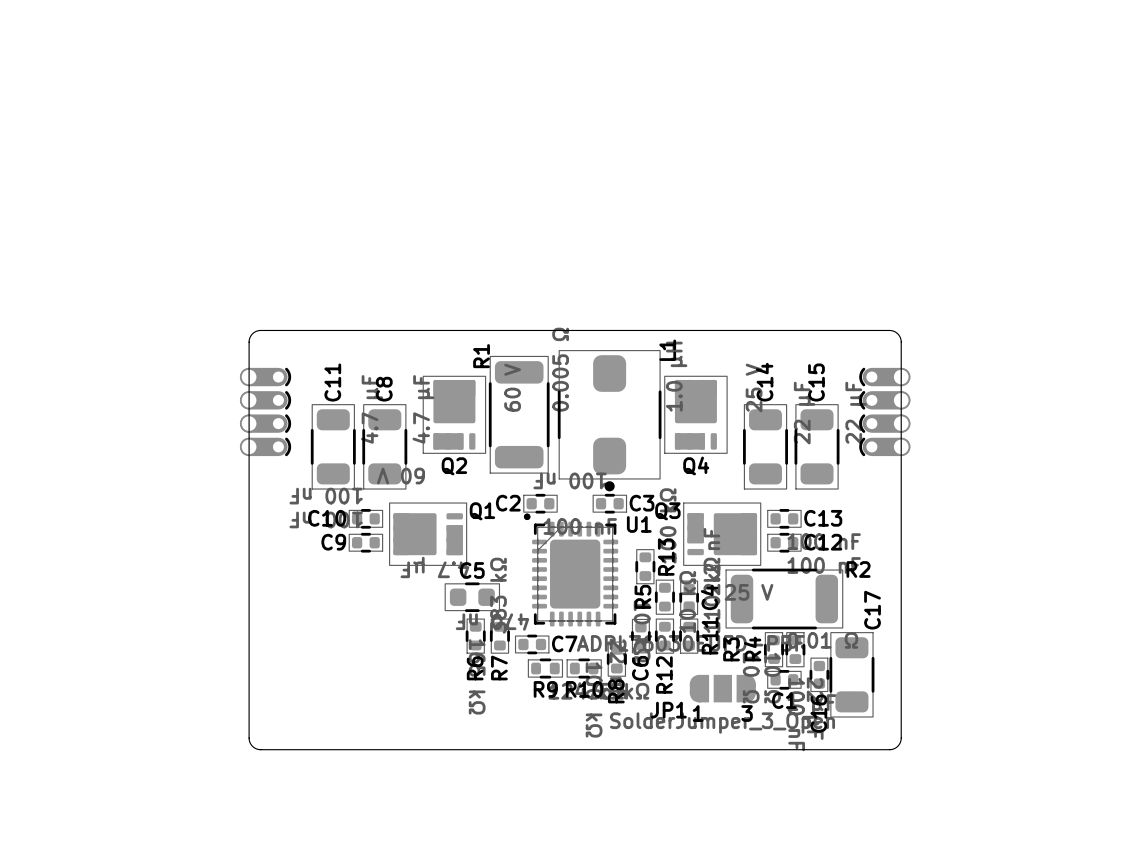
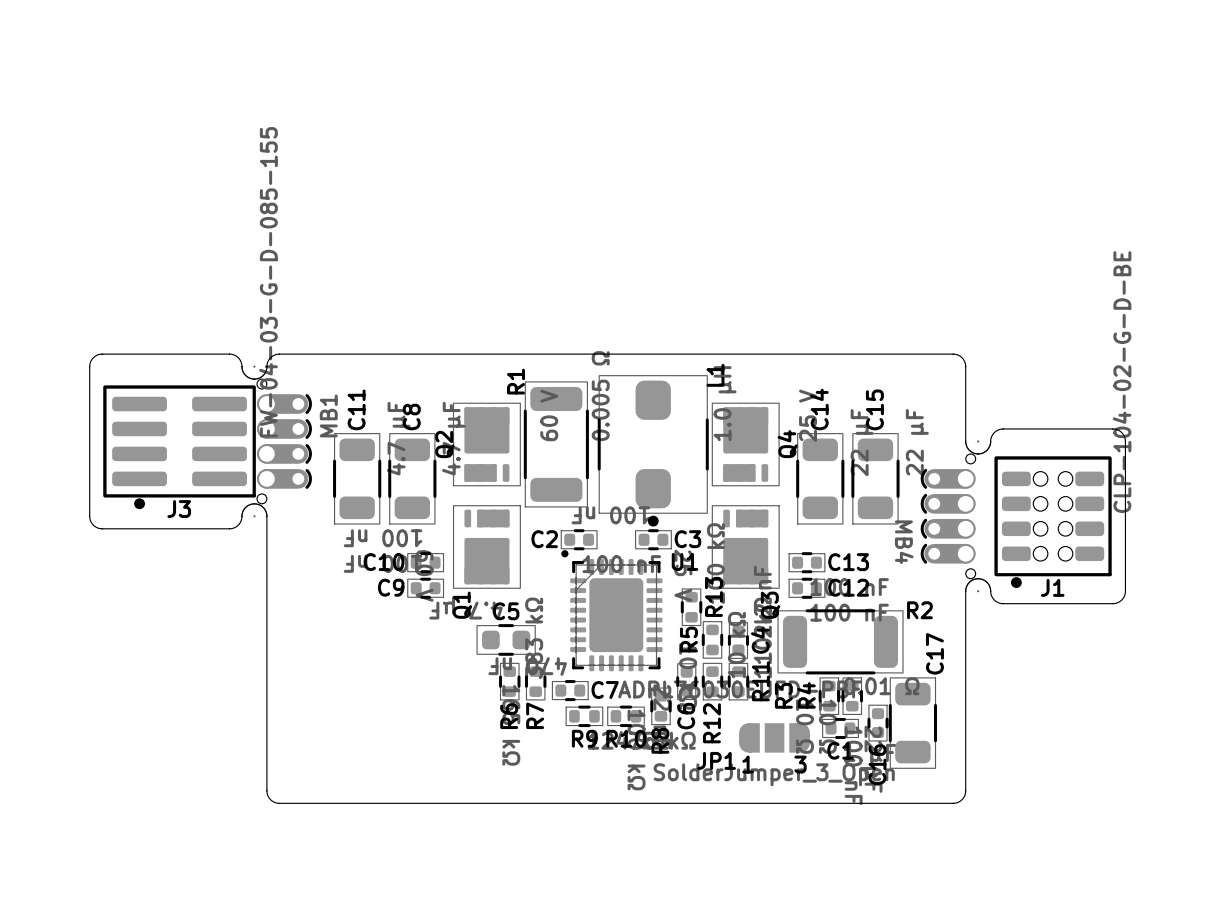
board edge: (249, 342) (249, 481) -> (266, 366) (262, 376) (257, 378) (250, 378) (243, 373) (239, 358) (229, 354) (100, 354) (93, 357) (89, 366) (89, 516) (94, 526) (102, 528) (230, 528) (240, 522) (244, 508) (253, 503) (263, 507) (266, 516)
part: (884, 377) -> none
part: (884, 400) -> none
MB1: none -> (254, 441)
board edge: (901, 411) (901, 551) -> (965, 441) (970, 451) (975, 453) (982, 453) (988, 448) (993, 433) (1003, 428) (1114, 429) (1121, 432) (1125, 441) (1125, 591) (1121, 600) (1112, 603) (1001, 603) (993, 598) (988, 584) (979, 578) (969, 582) (965, 591)
J3: none -> FW-04-03-G-D-085-155 (179, 447)
part: (884, 423) -> none
Q4 name rotation: 0° (696, 465) -> 90° counterclockwise (787, 444)
Q4 name position: Q4 (696, 465) -> Q4 (787, 444)
Q2 name rotation: 0° (454, 466) -> 90° counterclockwise (444, 444)
Q2 name position: Q2 (454, 466) -> Q2 (444, 444)
part: none -> (948, 503)
MB4: none -> (978, 516)
J1: none -> CLP-104-02-G-D-BE (1053, 522)
part: none -> (948, 528)
Q1 name position: Q1 (482, 511) -> Q1 (462, 605)
Q3 name position: Q3 (667, 511) -> Q3 (770, 605)
part: none -> (948, 553)
C10 position: (365, 518) -> (425, 562)
C13 position: (784, 518) -> (807, 562)
Q1 rotation: 0° (428, 534) -> 90° counterclockwise (486, 546)
Q3 rotation: 0° (722, 534) -> 90° clockwise (745, 547)
C9 position: (365, 542) -> (425, 588)
C12 position: (784, 542) -> (807, 588)

